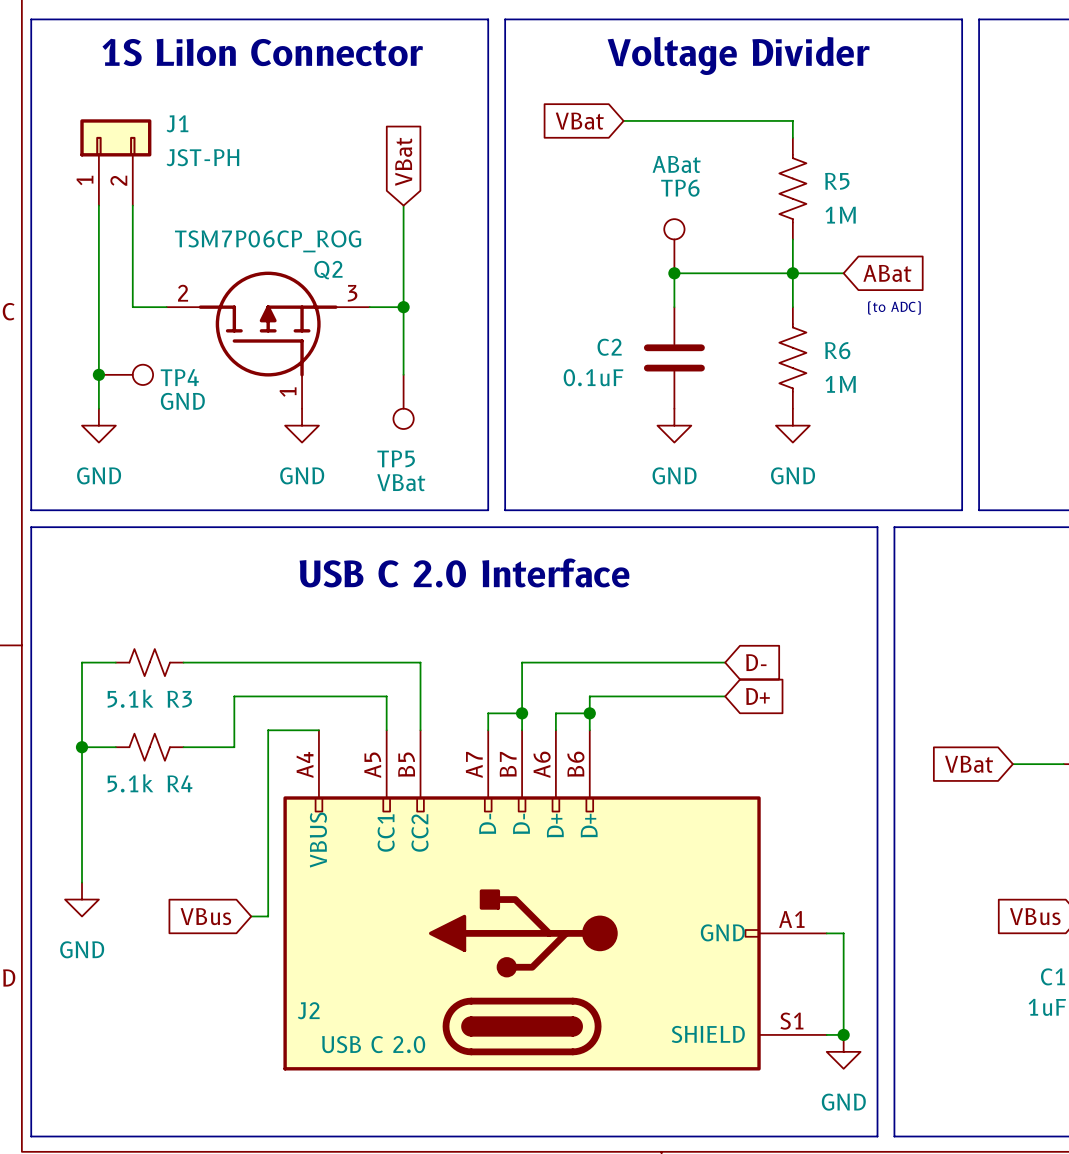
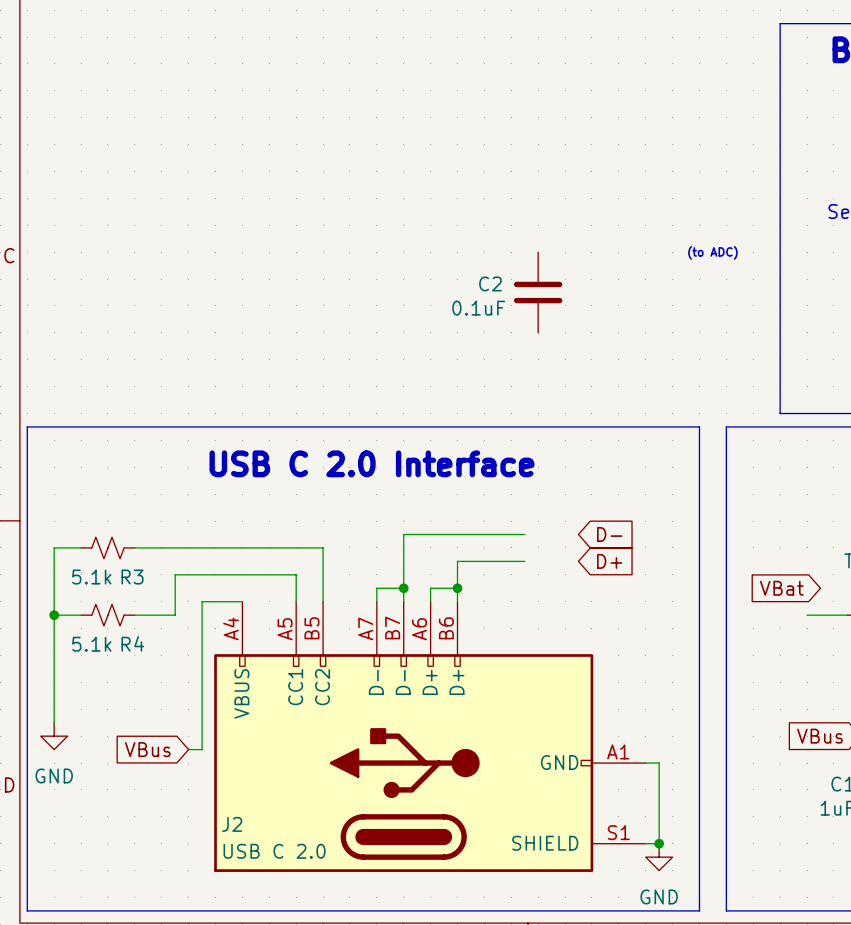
line: (31, 19) (488, 19) (488, 510) (31, 510) (31, 19) -> none
line: (505, 19) (962, 19) (962, 510) (505, 510) (505, 19) -> none
text: 1S LiIon Connector (262, 52) -> none
text: Voltage Divider (738, 55) -> none
wire: (623, 120) (792, 120) (792, 137) -> none
global label: VBat (579, 121) -> none
global label: VBat (403, 161) -> none
J1: JST-PH (115, 162) -> none
R5: 1M (792, 188) -> none
wire: (98, 205) (98, 408) -> none
wire: (132, 205) (132, 307) (166, 307) -> none
wire: (403, 205) (403, 374) -> none
wire: (792, 239) (792, 307) -> none
TP6: ABat (674, 246) -> none
junction: (674, 273) -> none
junction: (792, 273) -> none
wire: (843, 273) (674, 273) (674, 307) -> none
global label: ABat (887, 273) -> none
wire: (369, 307) (403, 307) -> none
junction: (403, 307) -> none
Q2: TSM7P06CP_ROG (268, 340) -> none
R6: 1M (792, 357) -> none
junction: (98, 374) -> none
TP4: GND (126, 374) -> none
TP5: VBat (403, 401) -> none
power symbol: GND (98, 425) -> none
power symbol: GND (302, 425) -> none
power symbol: GND (674, 425) -> none
power symbol: GND (792, 425) -> none
line: (911, 527) (894, 527) (894, 1136) (911, 1136) -> (726, 426) (726, 910)
wire: (115, 662) (82, 662) (82, 882) -> (81, 547) (54, 547) (54, 722)
R3 position: (149, 662) -> (107, 547)
wire: (183, 662) (420, 662) (420, 730) -> (134, 547) (323, 547) (323, 601)
wire: (522, 662) (522, 730) -> (417, 534) (403, 534) (403, 601)
wire: (657, 662) (725, 662) -> none
wire: (589, 696) (589, 730) -> (470, 561) (457, 561) (457, 601)
wire: (657, 696) (725, 696) -> none
wire: (522, 713) (488, 713) (488, 730) -> (403, 588) (376, 588) (376, 601)
junction position: (522, 713) -> (403, 588)
wire: (589, 713) (555, 713) (555, 730) -> (457, 588) (430, 588) (430, 601)
junction position: (589, 713) -> (457, 588)
wire: (318, 730) (268, 730) (268, 916) (251, 916) -> (242, 601) (202, 601) (202, 749) (188, 749)
wire: (386, 730) (386, 696) (234, 696) (234, 747) (183, 747) -> (296, 601) (296, 574) (175, 574) (175, 615) (134, 615)
wire: (82, 747) (115, 747) -> (54, 615) (81, 615)
junction position: (82, 747) -> (54, 615)
R4 position: (149, 747) -> (107, 615)
global label position: VBat (969, 764) -> VBat (781, 588)
power symbol position: GND (82, 899) -> GND (54, 736)
J2 position: (555, 900) -> (429, 736)
global label position: VBus (205, 916) -> VBus (147, 749)
wire: (826, 933) (843, 933) (843, 1034) (826, 1034) -> (645, 763) (659, 763) (659, 843) (645, 843)
junction position: (843, 1034) -> (659, 843)
power symbol position: GND (843, 1051) -> GND (659, 857)

